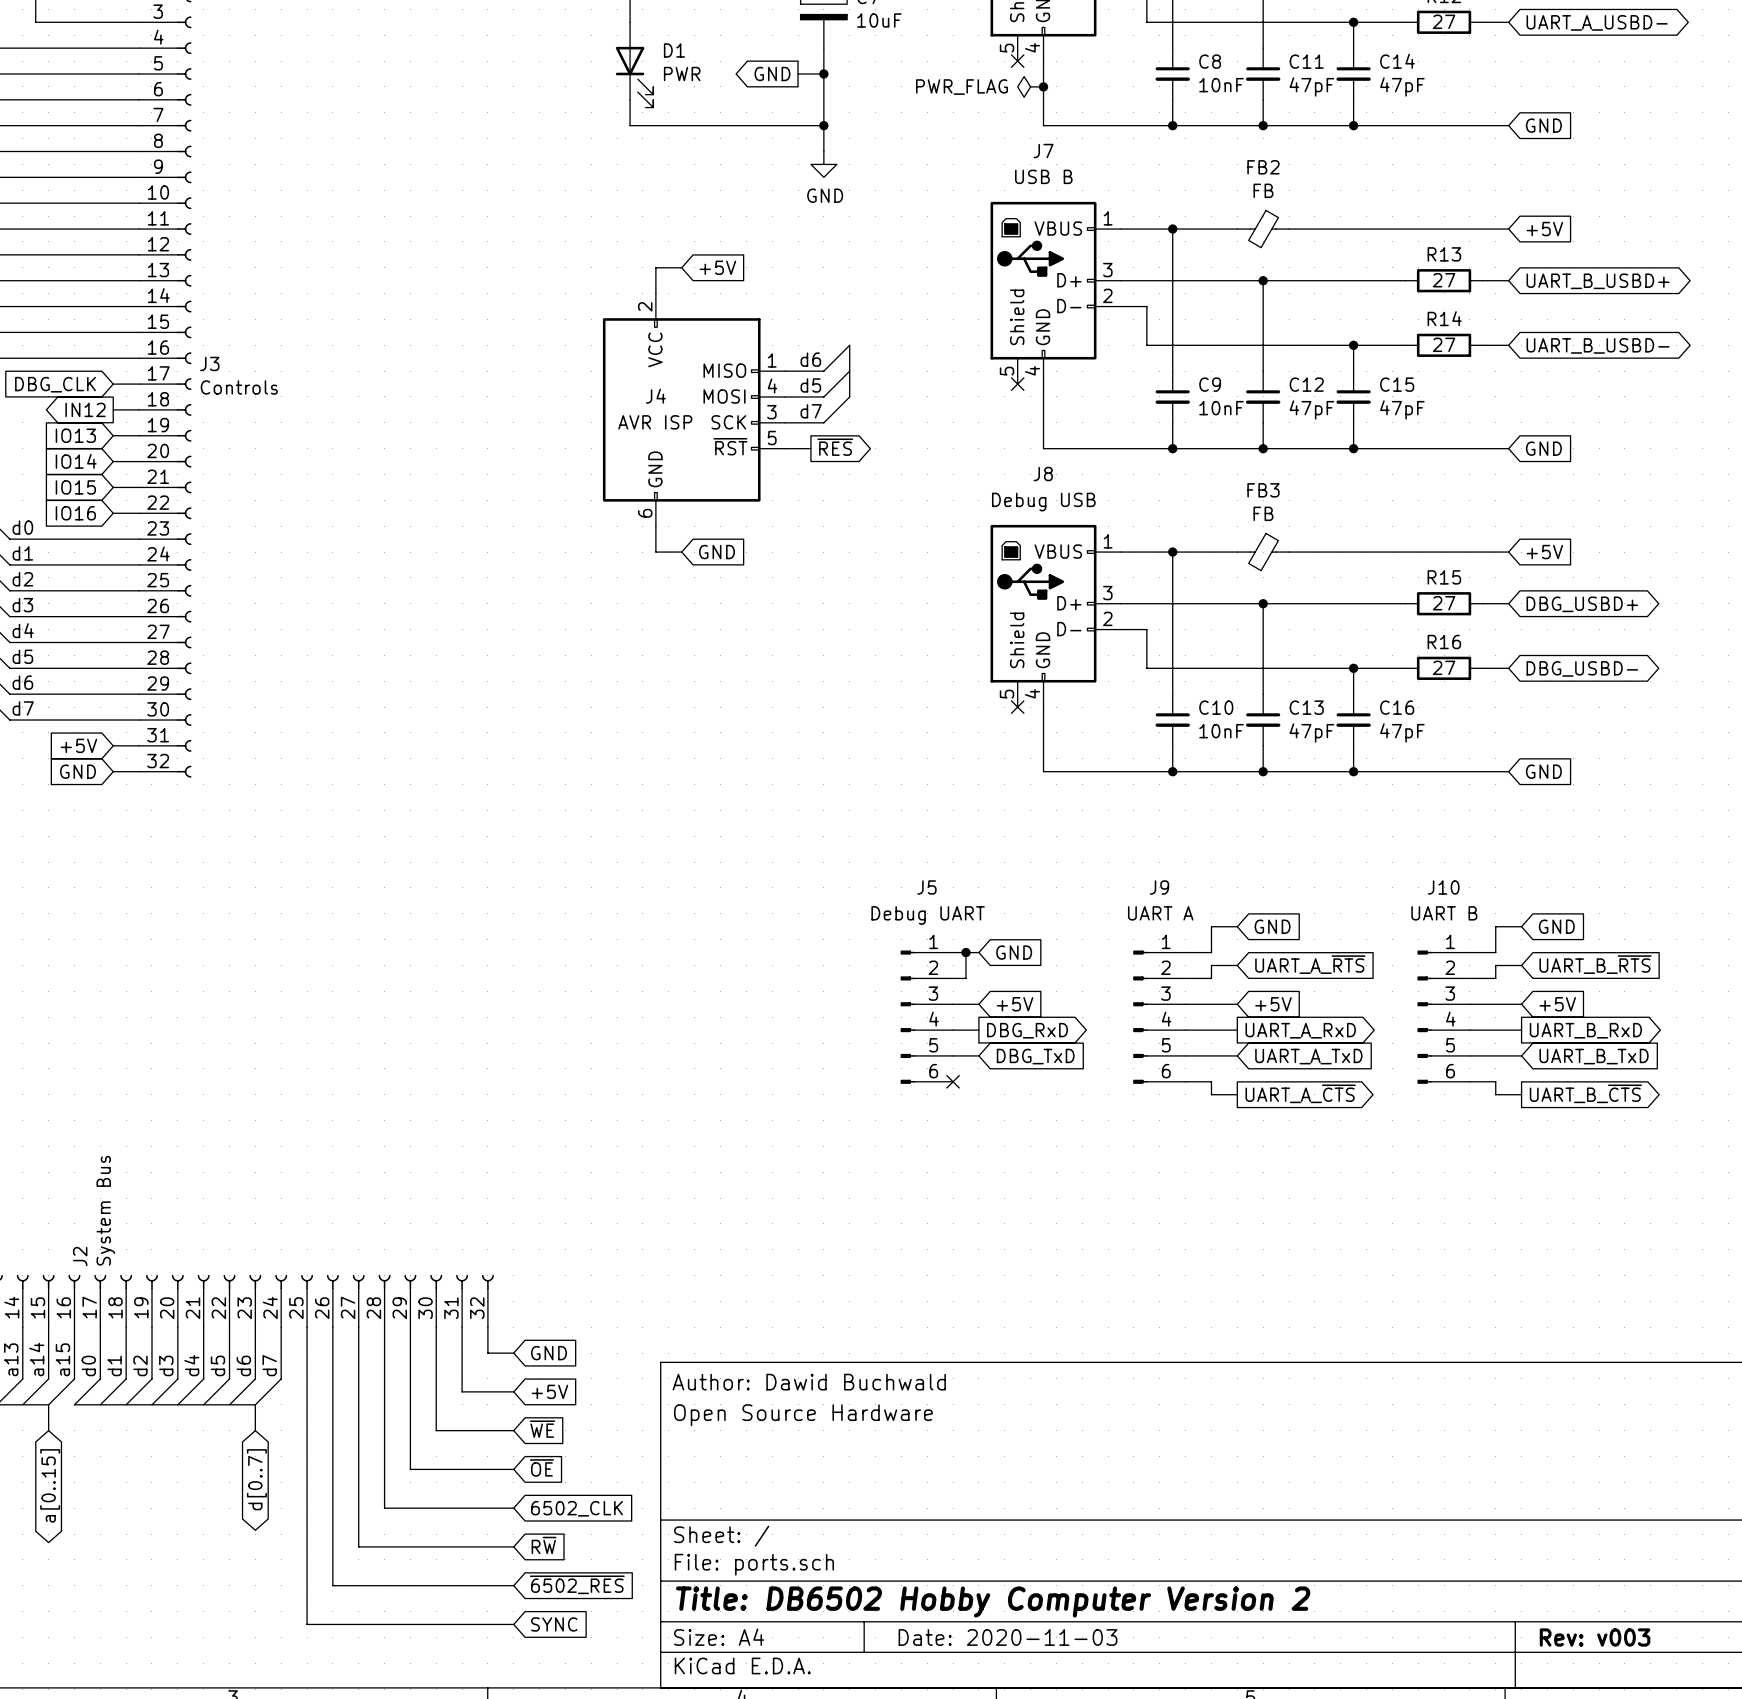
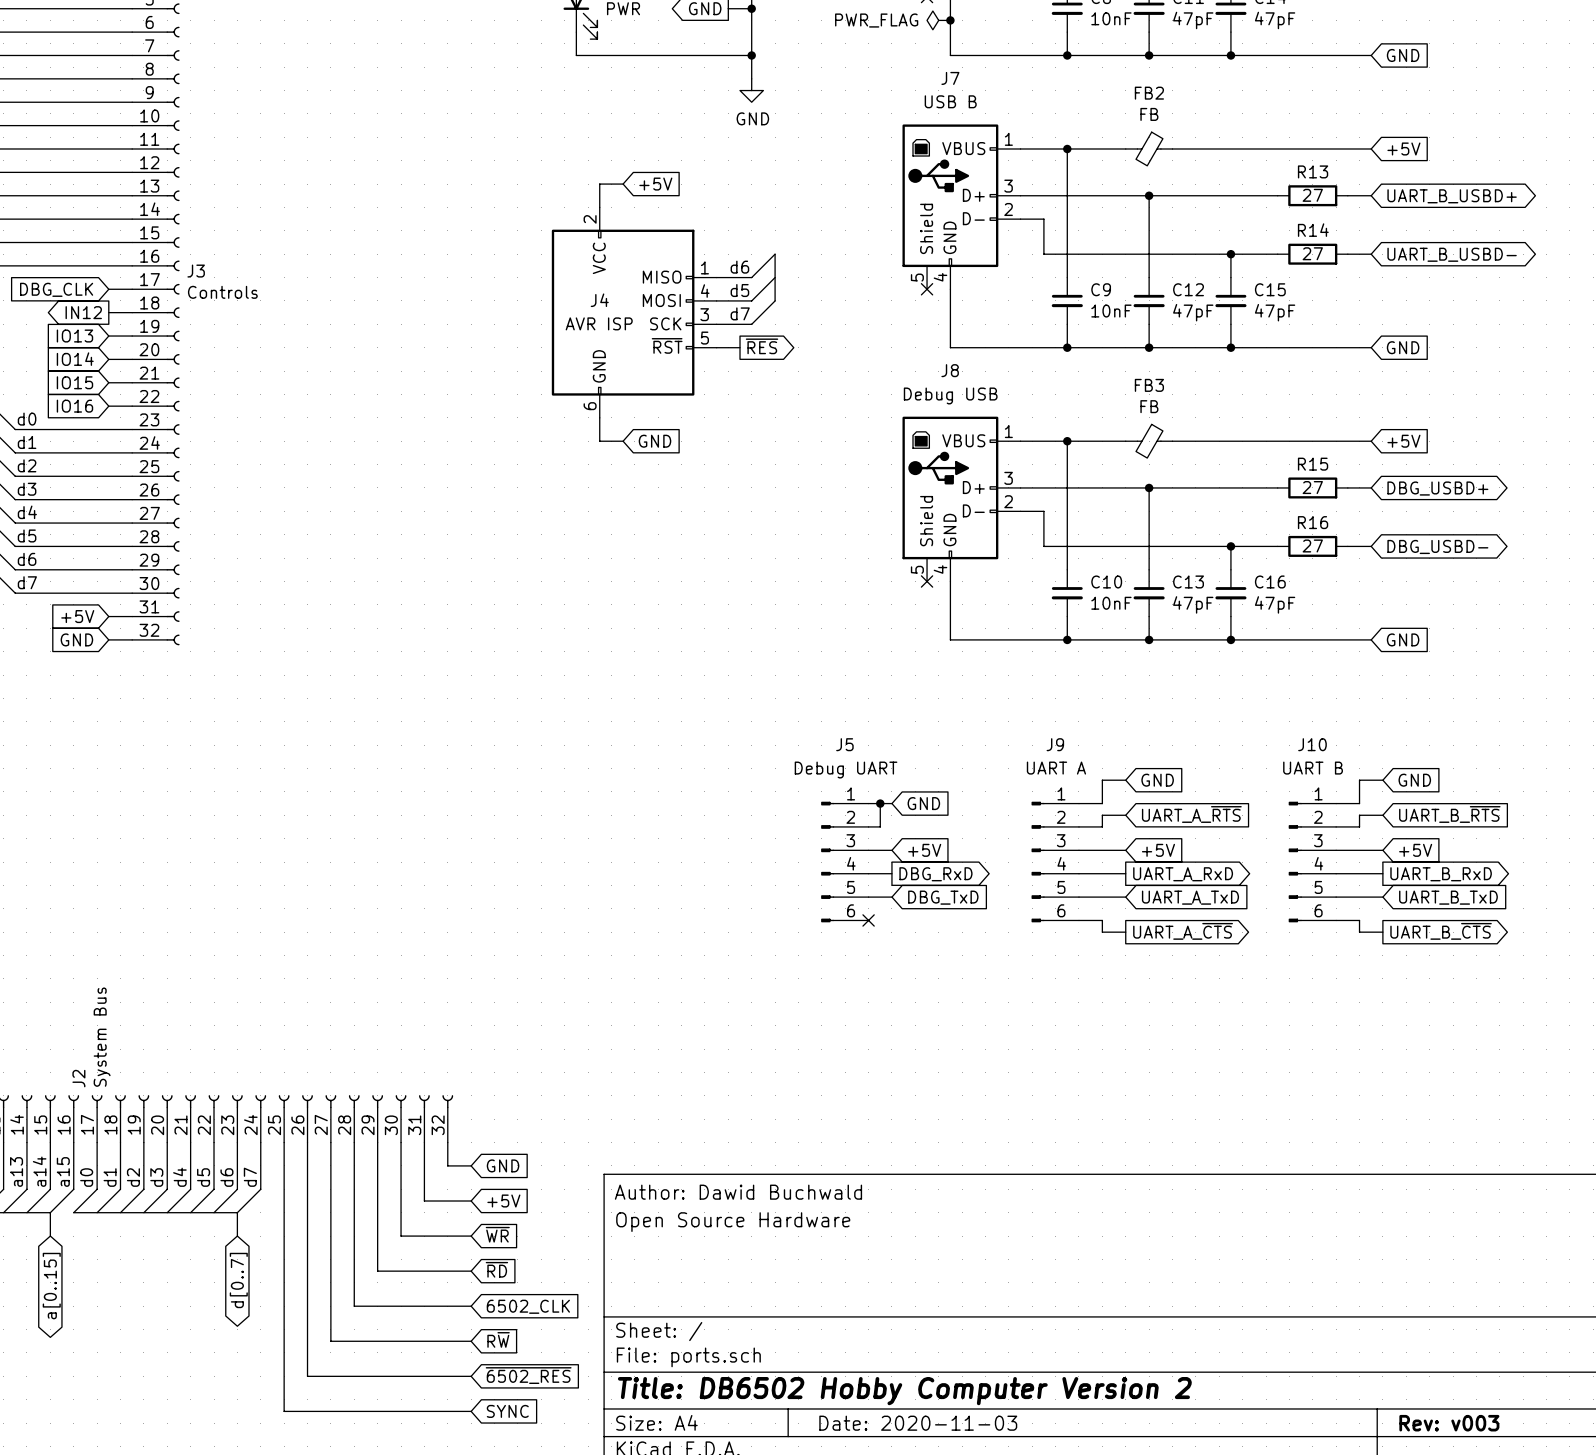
global label: ~{WE} (542, 1429) -> ~{WR} (497, 1234)
global label: ~{OE} (541, 1467) -> ~{RD} (496, 1269)

